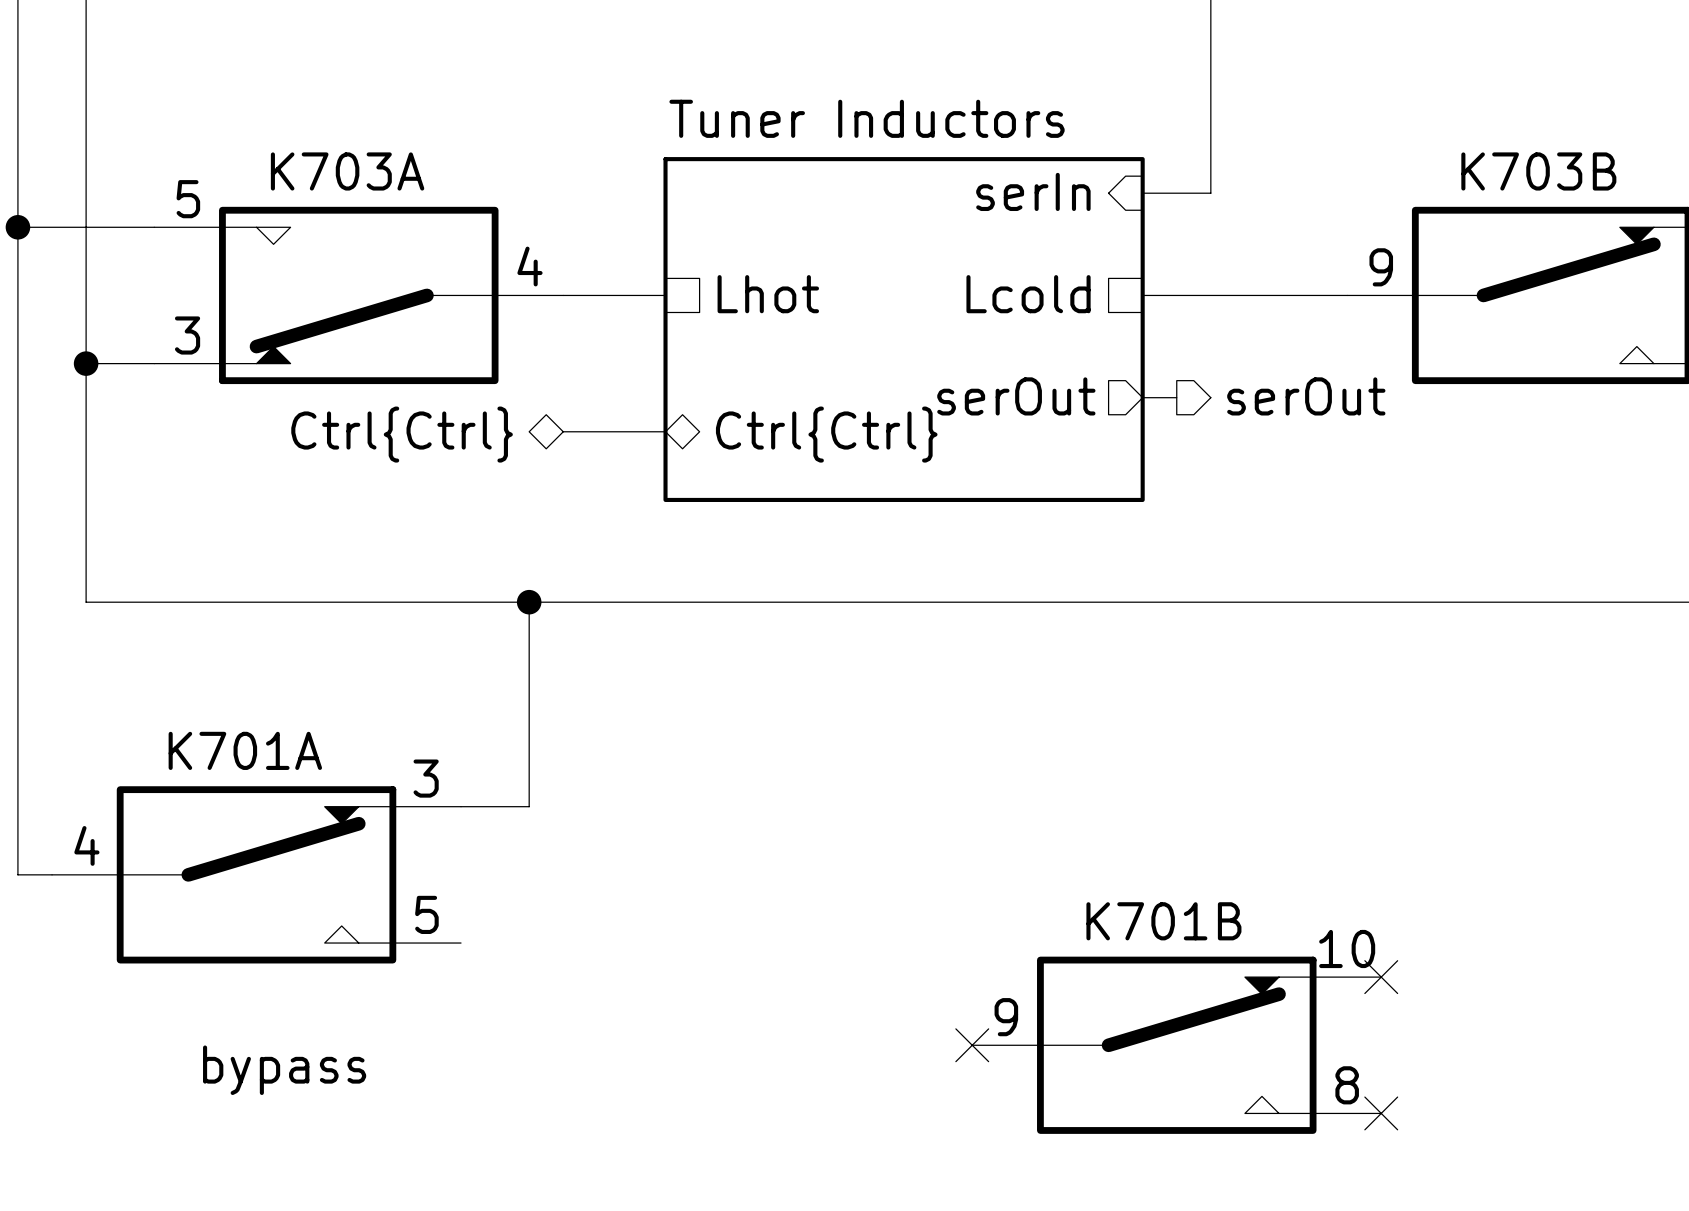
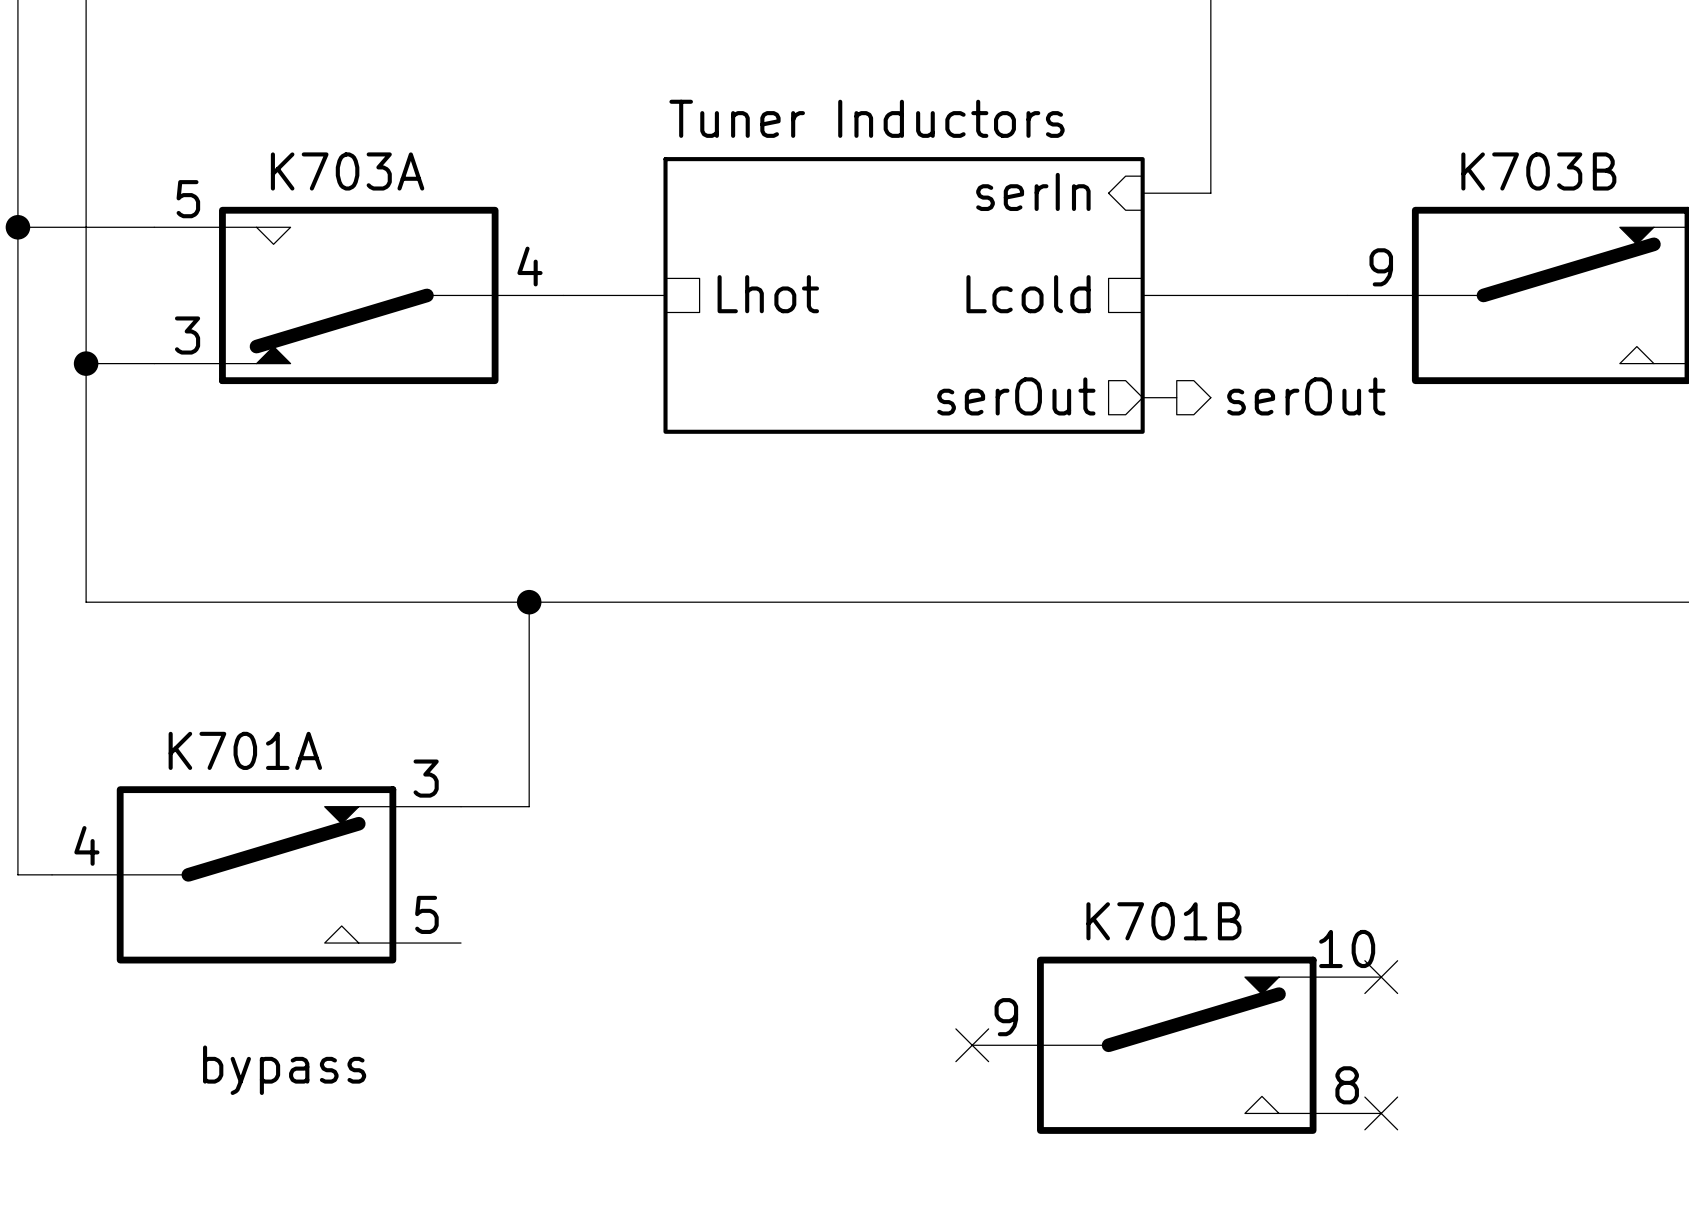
sheet Tuner Inductors: none -> (904, 295)
sheet Tuner Inductors: (904, 329) -> none
bus: (563, 431) (665, 431) -> none
hierarchical label: Ctrl{Ctrl} (402, 434) -> none
sheet pin: Ctrl{Ctrl} (826, 434) -> none

